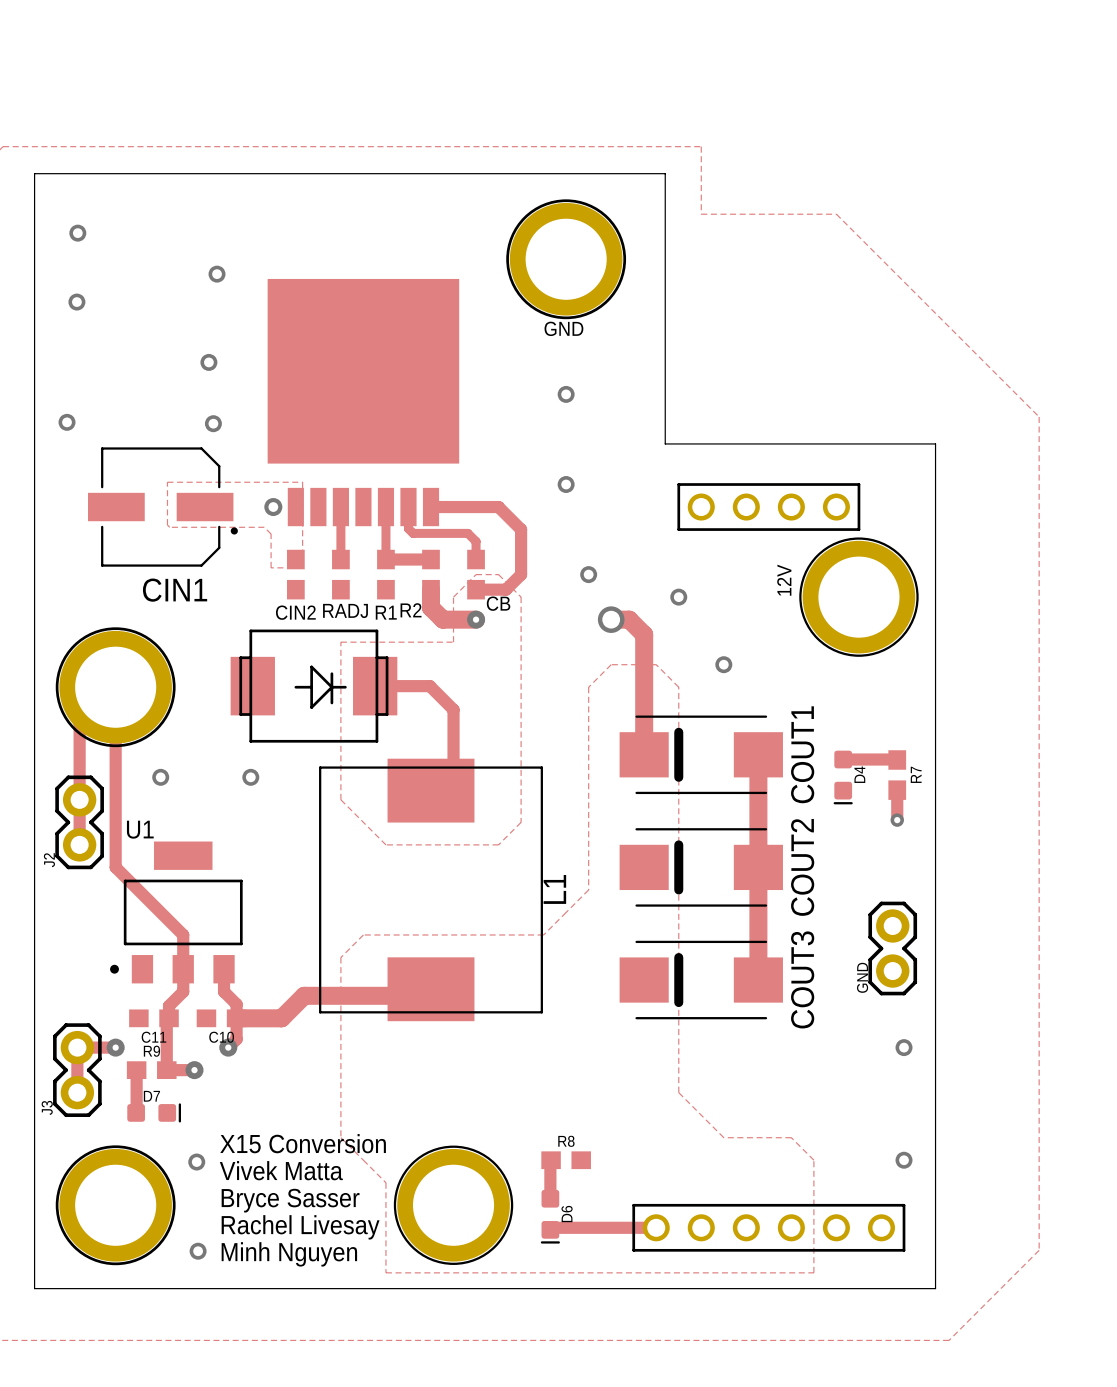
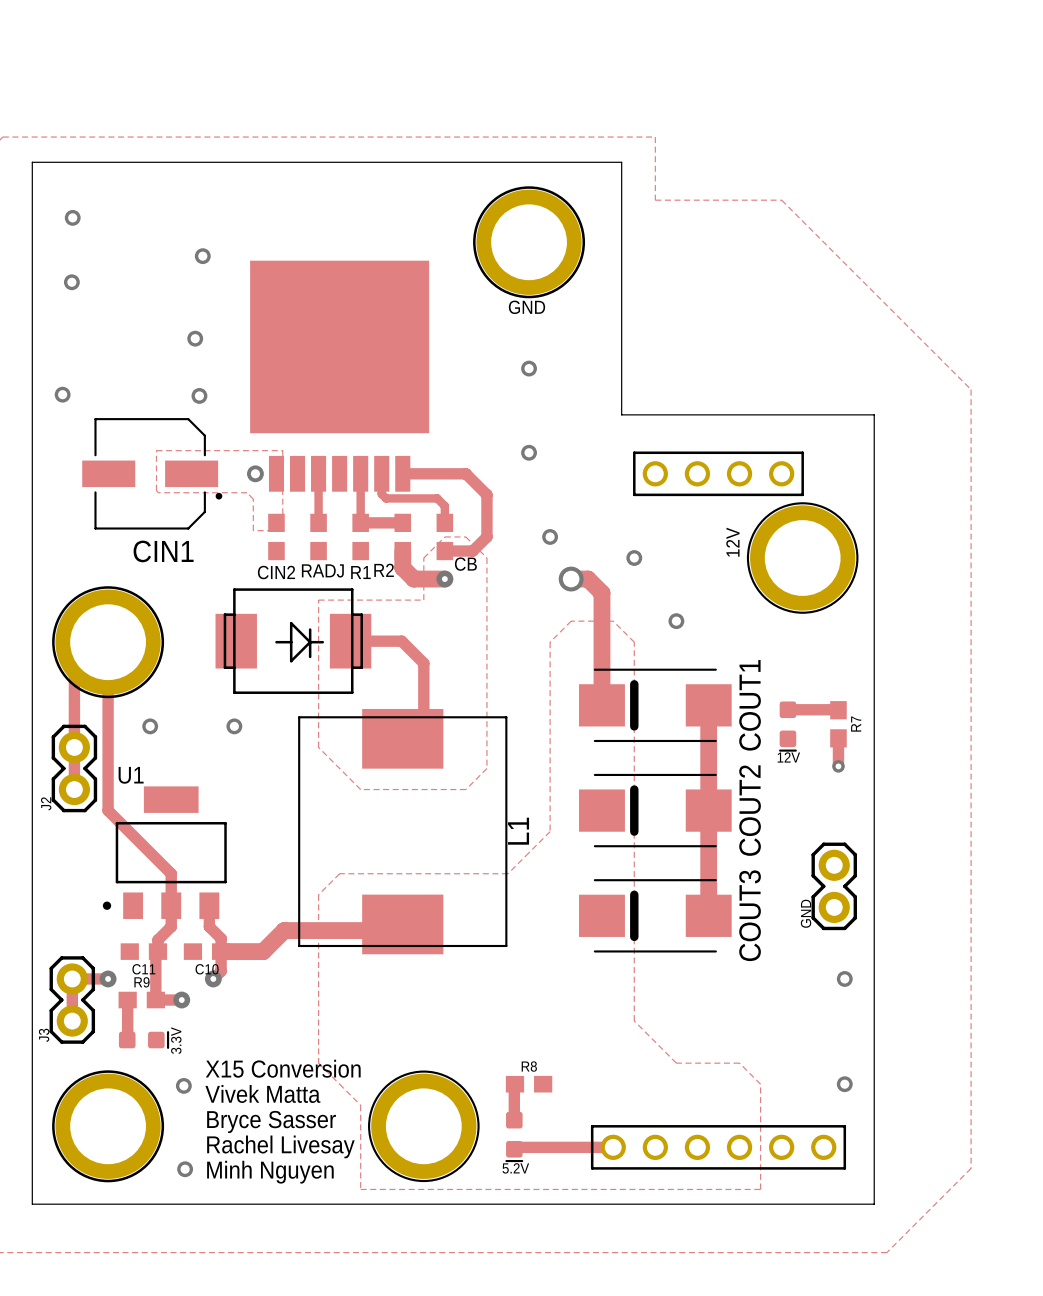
D4 name: D4 (859, 774) -> 12V (788, 757)
D7 name: D7 (151, 1096) -> 3.3V (176, 1040)
D6 name: D6 (567, 1214) -> 5.2V (515, 1168)

